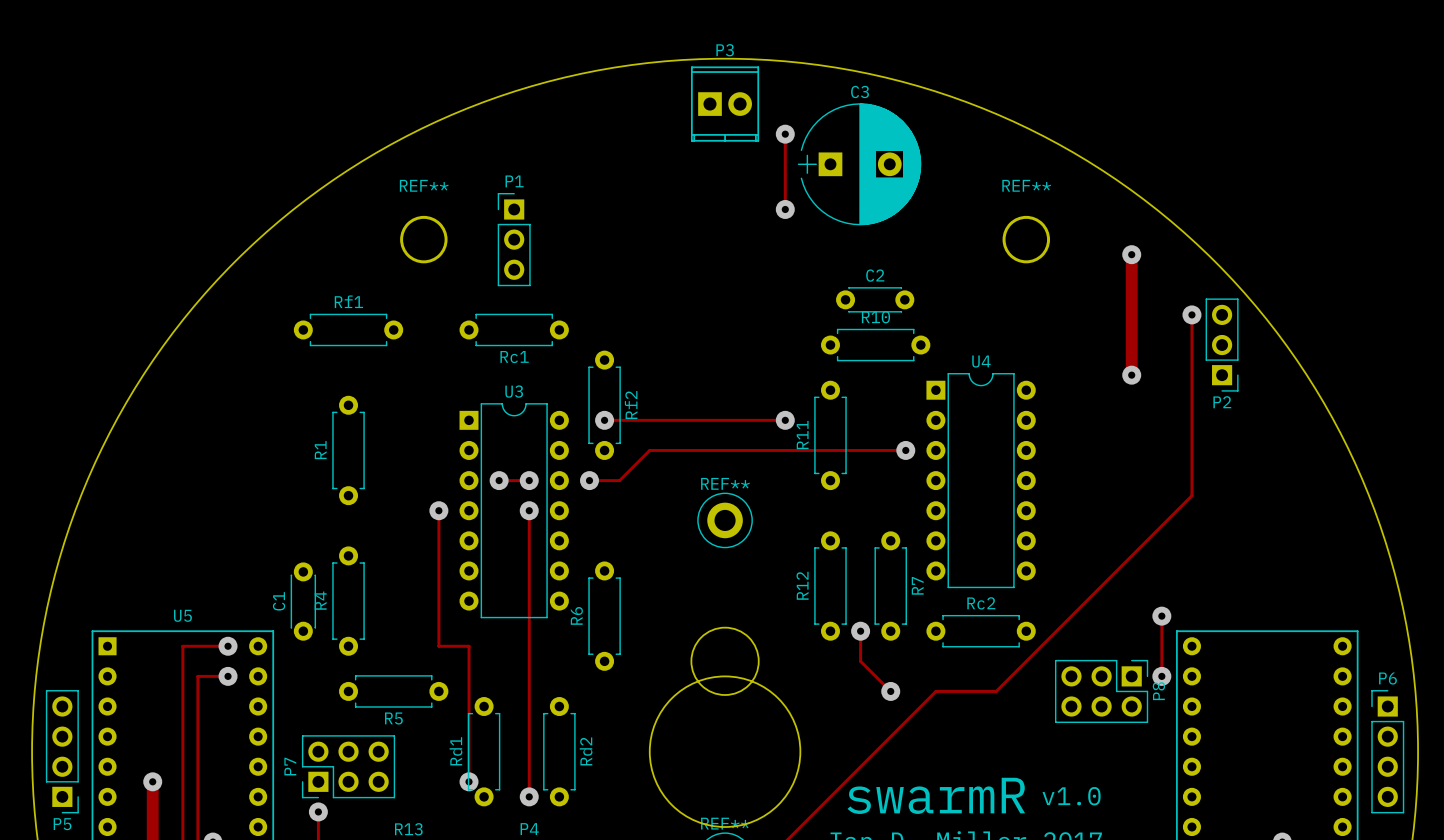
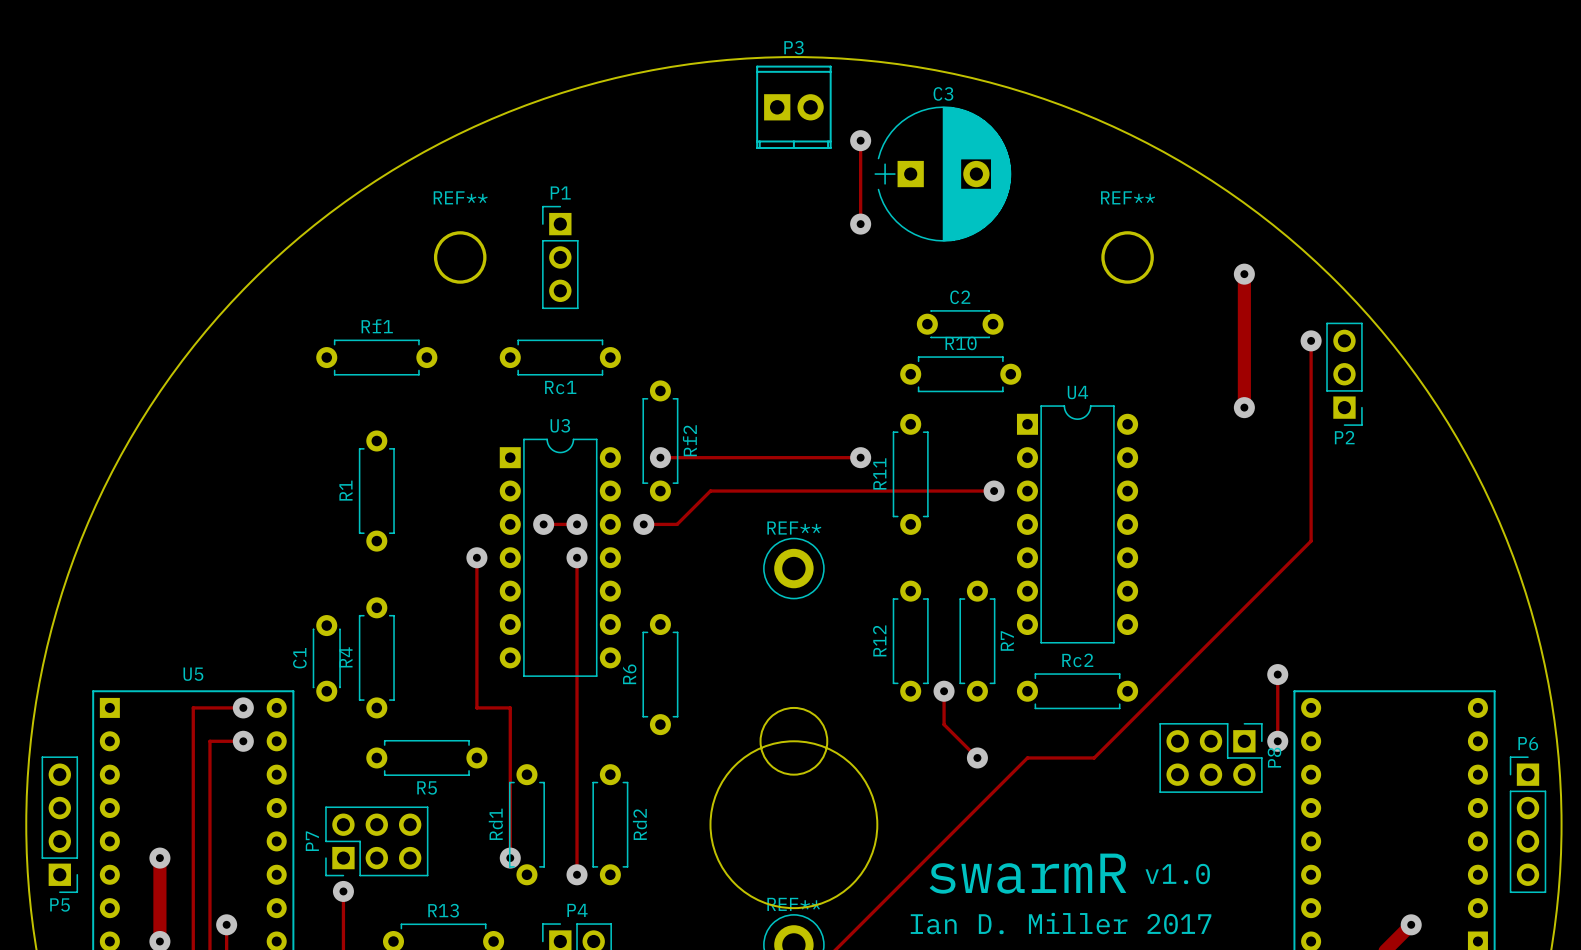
round board edge: [690, 626, 760, 696] -> none
round board edge: none -> [759, 706, 829, 776]

